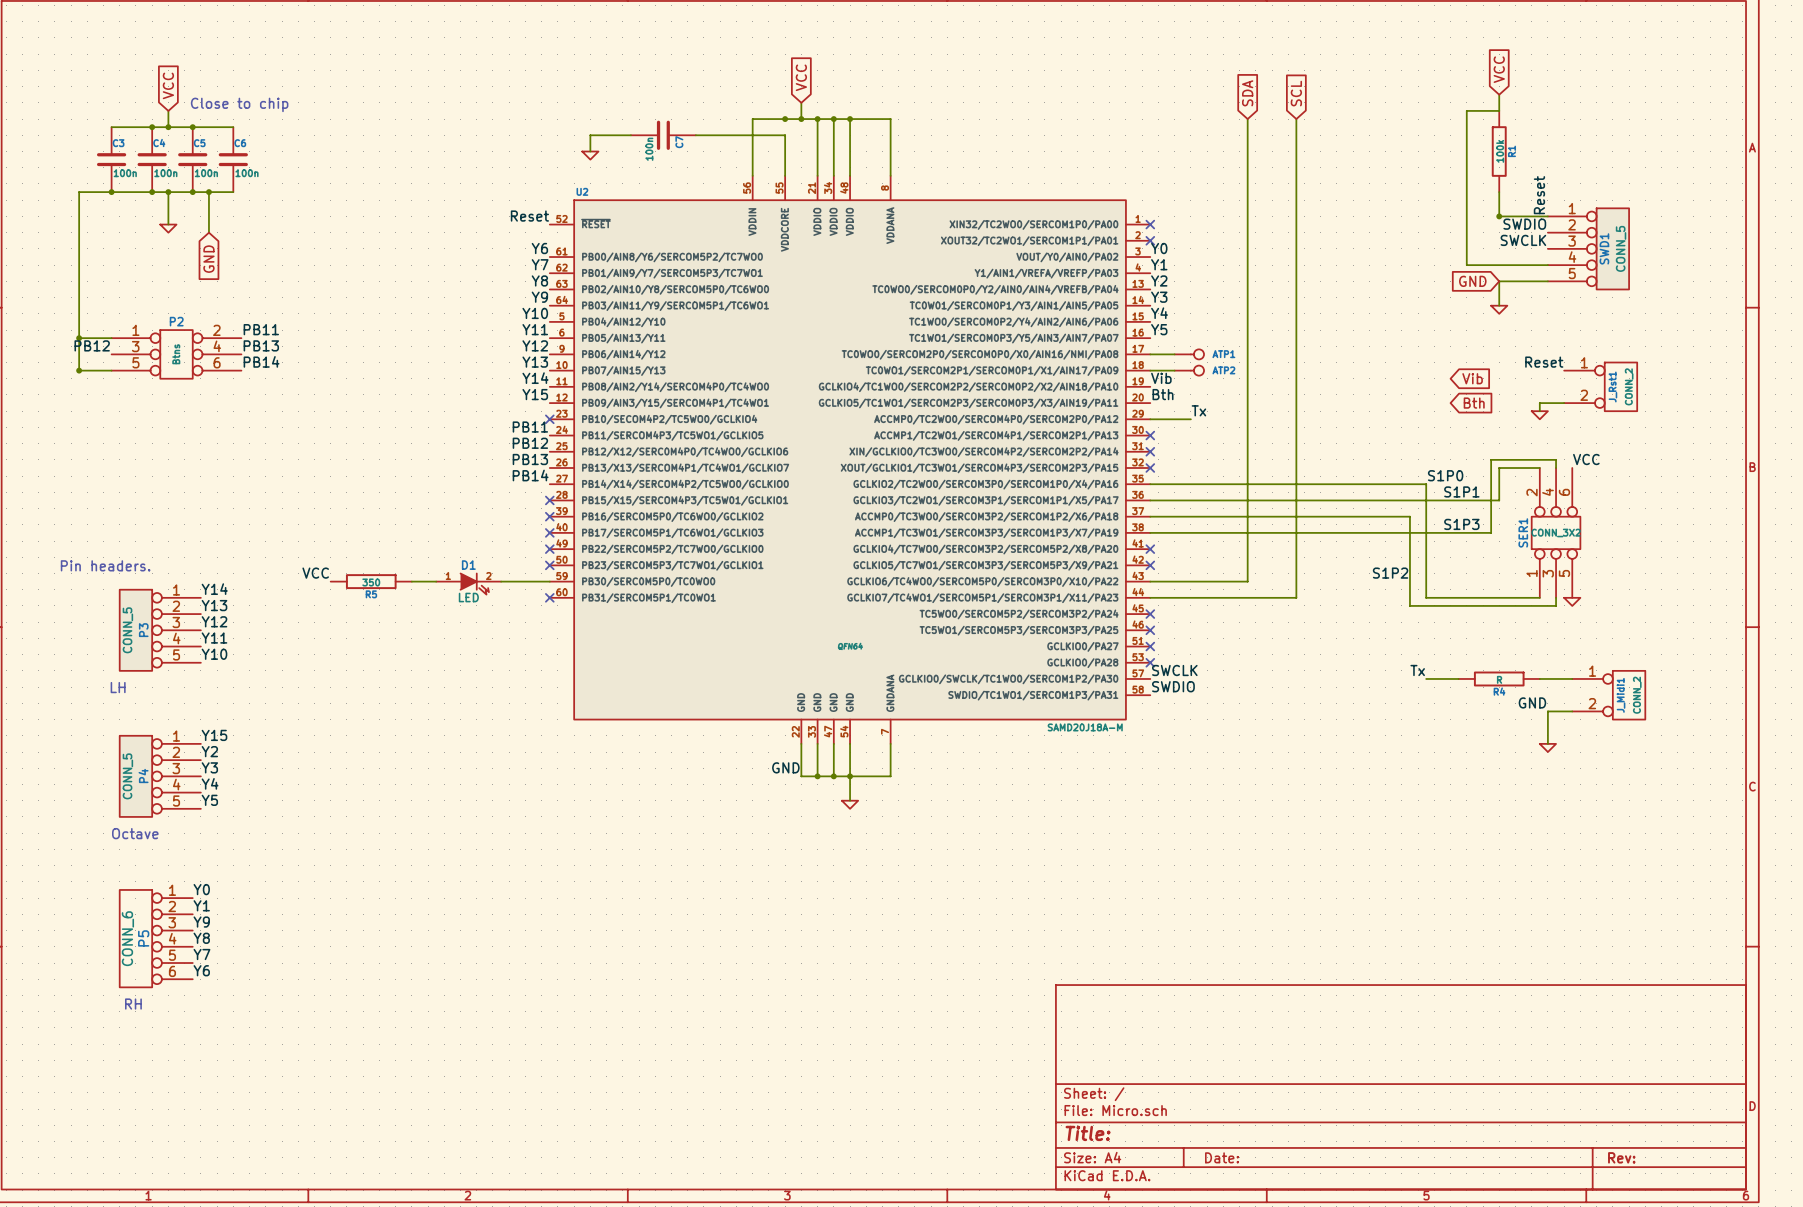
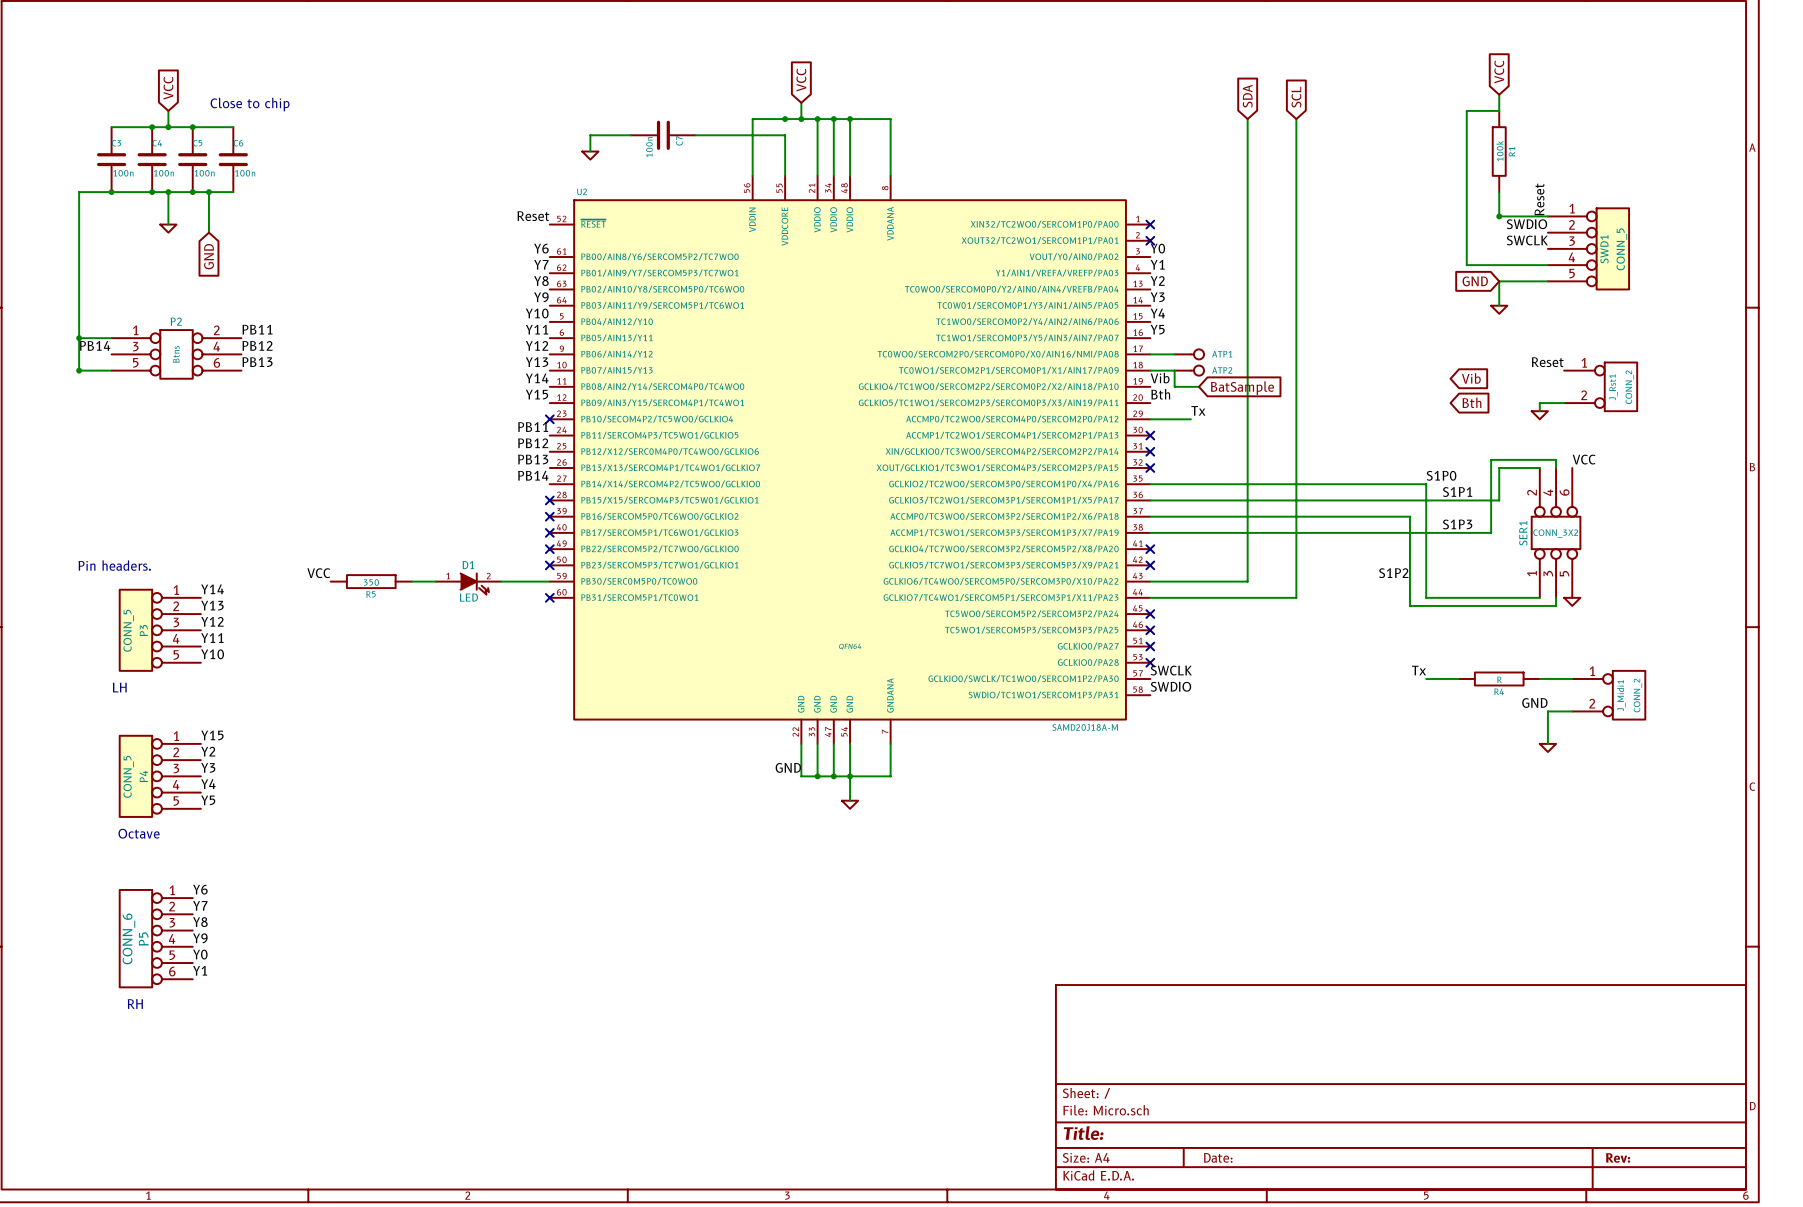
label: PB12 (92, 345) -> PB14 (95, 345)
label: PB13 (261, 345) -> PB12 (257, 345)
label: PB14 (261, 361) -> PB13 (257, 362)
wire: none -> (1174, 370) (1174, 386) (1198, 386)
global label: none -> BatSample (1242, 388)
label: Y0 (201, 889) -> Y6 (200, 889)
label: Y1 (201, 905) -> Y7 (200, 905)
label: Y9 (201, 922) -> Y8 (200, 922)
label: Y8 (201, 938) -> Y9 (200, 938)
label: Y7 (201, 954) -> Y0 (200, 954)
label: Y6 (201, 970) -> Y1 (200, 970)

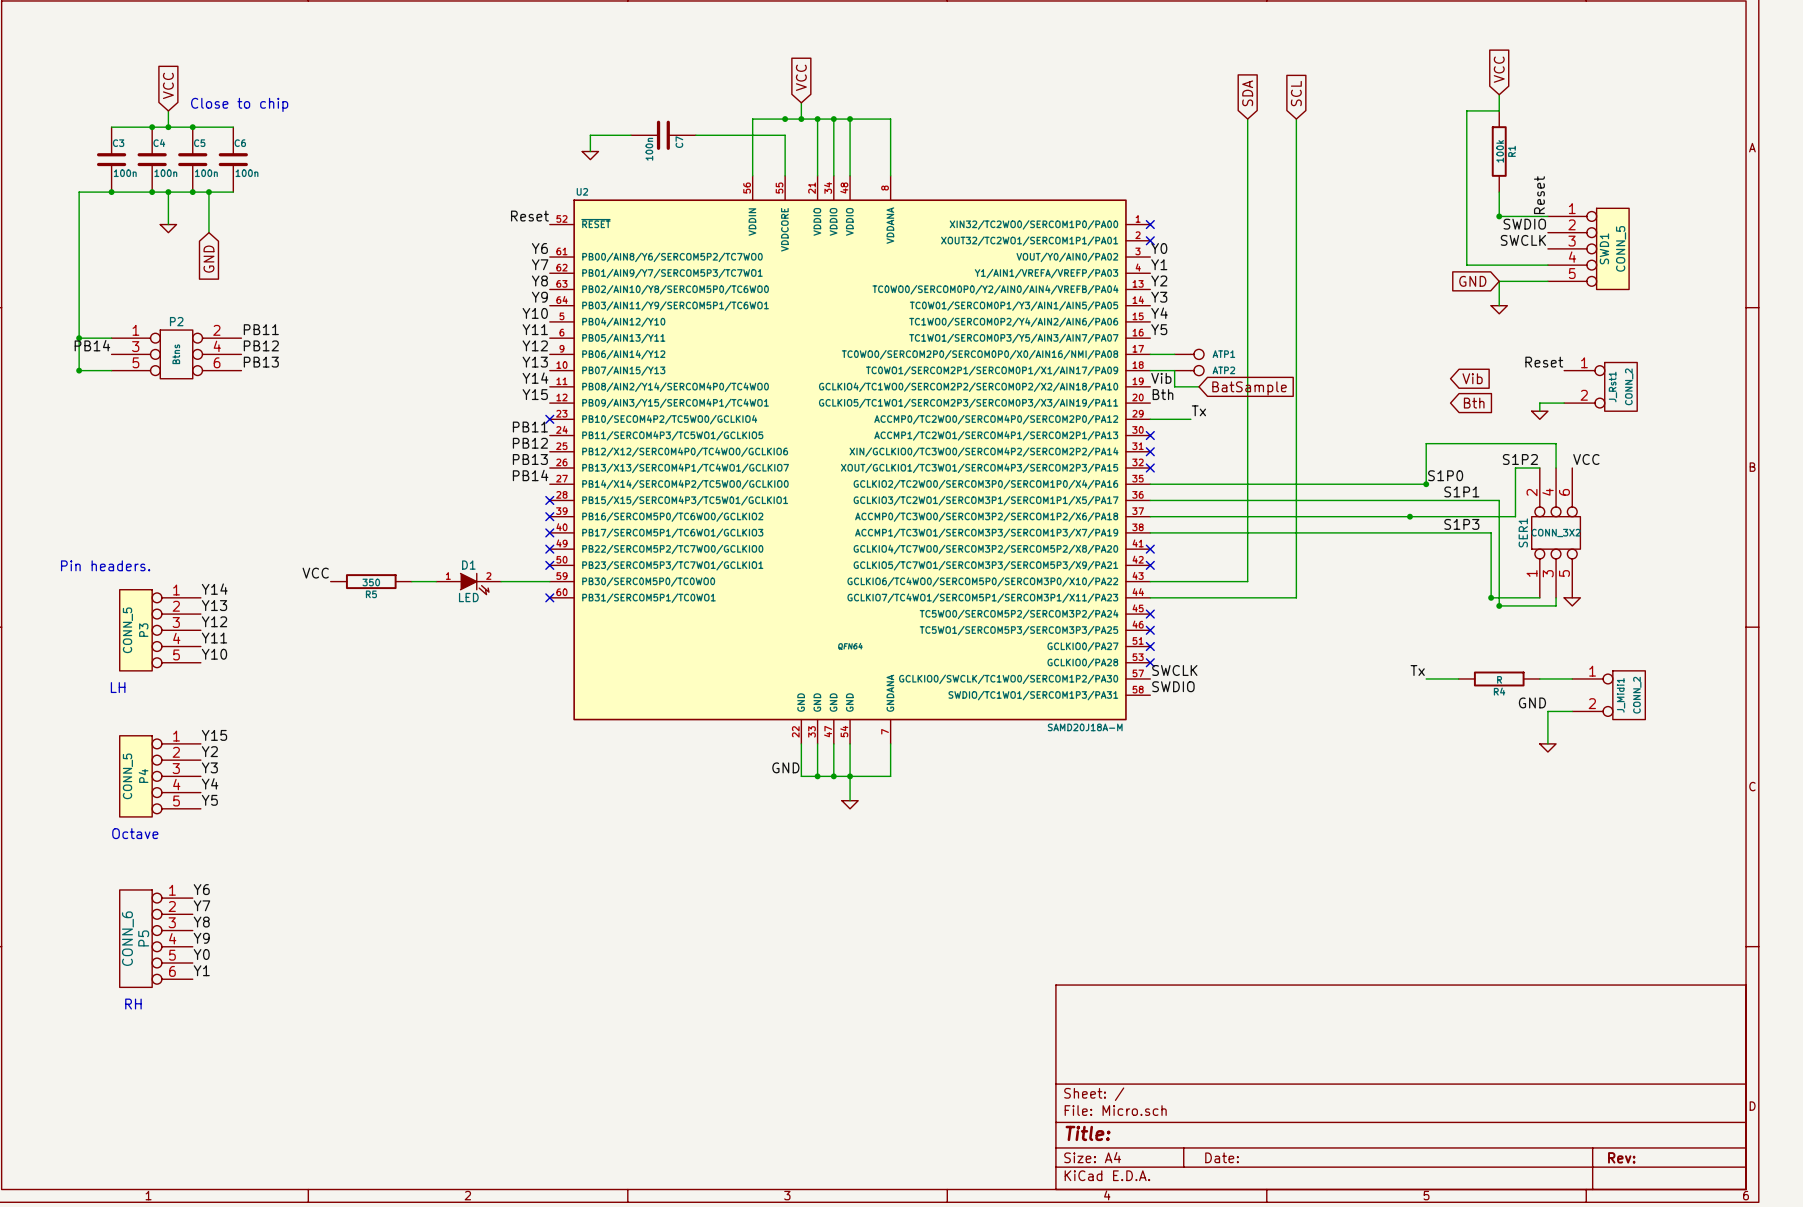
label: none -> S1P2 (1520, 459)
wire: (1556, 459) (1491, 459) (1491, 532) -> (1556, 459) (1556, 443) (1426, 443) (1426, 484)
wire: (1515, 468) (1499, 468) (1499, 500) -> (1515, 468) (1515, 516) (1409, 516)
wire: (1426, 484) (1426, 597) (1491, 597) -> (1491, 532) (1491, 597)
junction: none -> (1426, 484)
wire: (1409, 516) (1409, 605) (1499, 605) -> (1499, 500) (1499, 605)
junction: none -> (1409, 516)
label: S1P2 (1393, 573) -> none
junction: none -> (1491, 597)
junction: none -> (1499, 605)

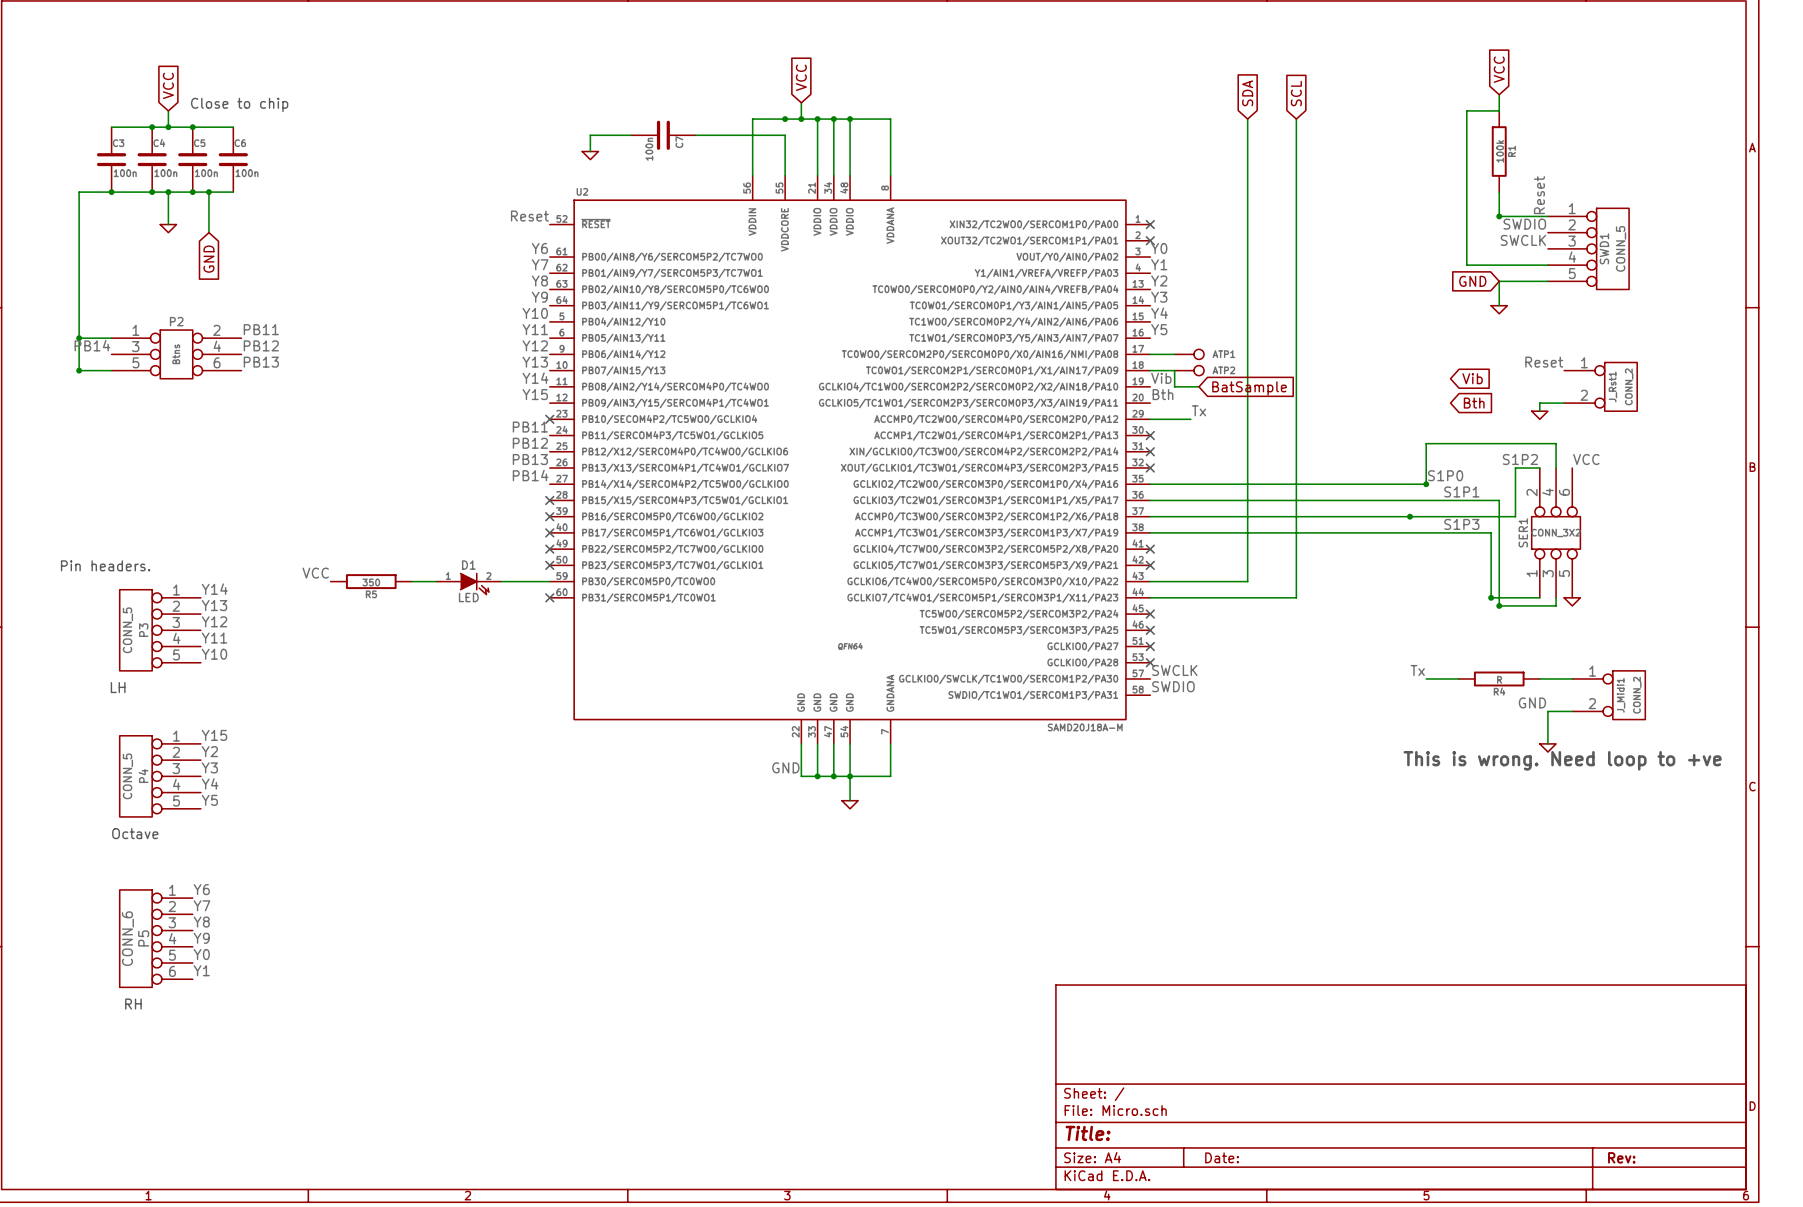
text: none -> This is wrong. Need loop to +ve (1562, 760)

